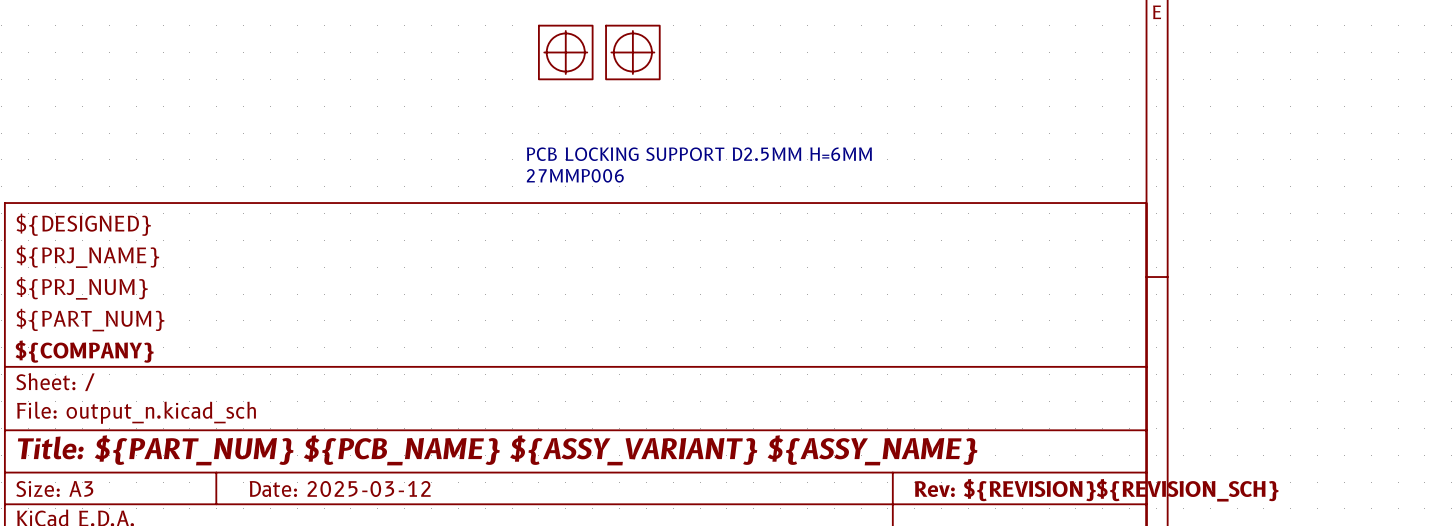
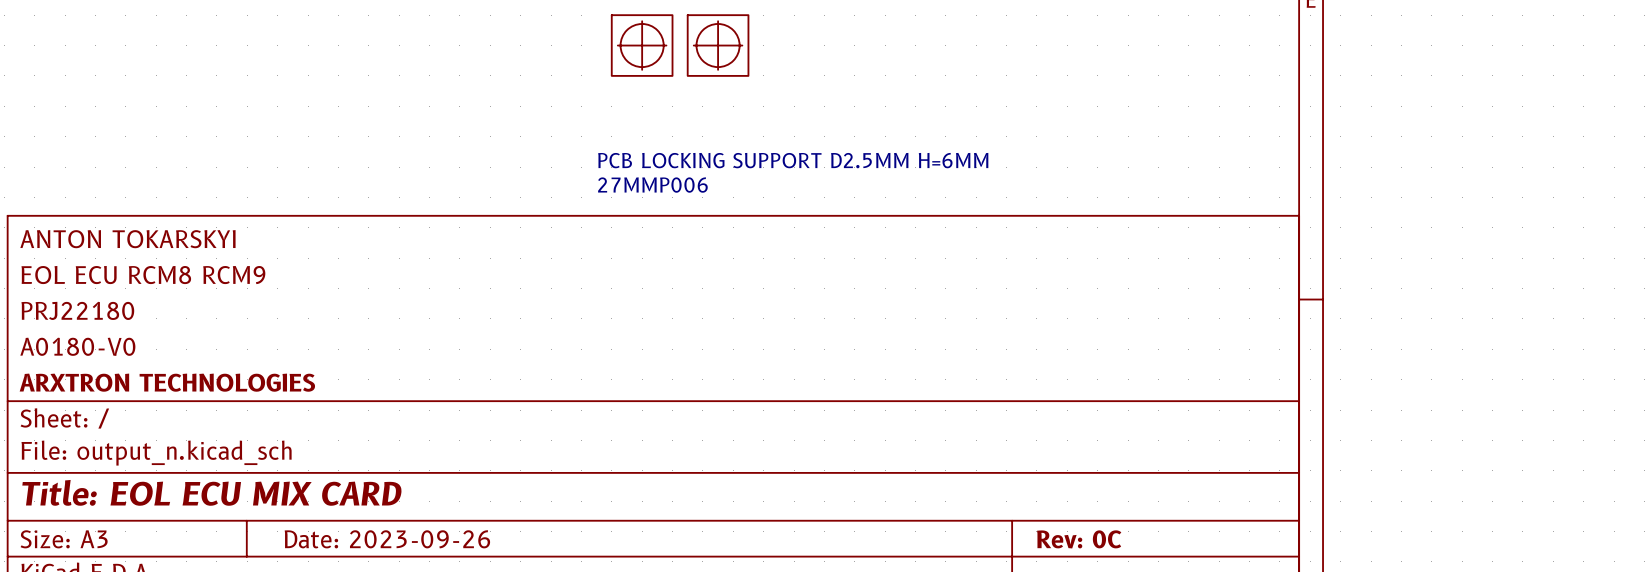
title block: ${DESIGNED} (83, 224) -> ANTON TOKARSKYI (127, 239)
title block: ${PRJ_NAME} (87, 256) -> EOL ECU RCM8 RCM9 (143, 275)
title block: ${PRJ_NUM} (82, 288) -> PRJ22180 (77, 310)
title block: ${PART_NUM} (90, 320) -> A0180-V0 (77, 346)
title block: ${COMPANY} (84, 351) -> ARXTRON TECHNOLOGIES (167, 382)
title block: Title: ${PART_NUM} ${PCB_NAME} ${ASSY_VARIANT} ${ASSY_NAME} (497, 450) -> Title: EOL ECU MIX CARD (212, 492)
title block: Date: 2025-03-12 (340, 488) -> Date: 2023-09-26 (387, 539)
title block: Rev: ${REVISION}${REVISION_SCH} (1096, 490) -> Rev: 0C (1079, 539)

